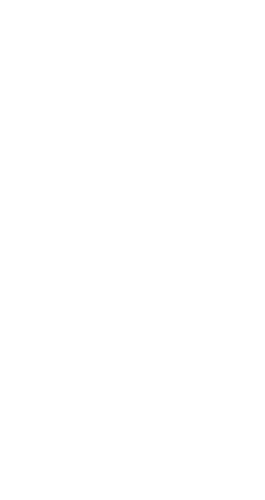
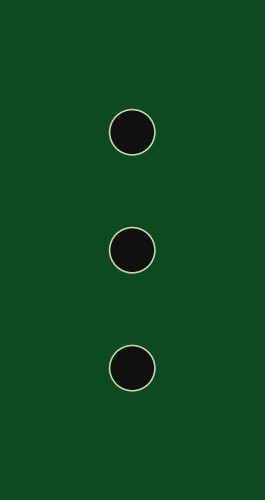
part: none -> (132, 132)
part: none -> (132, 250)
part: none -> (132, 368)

